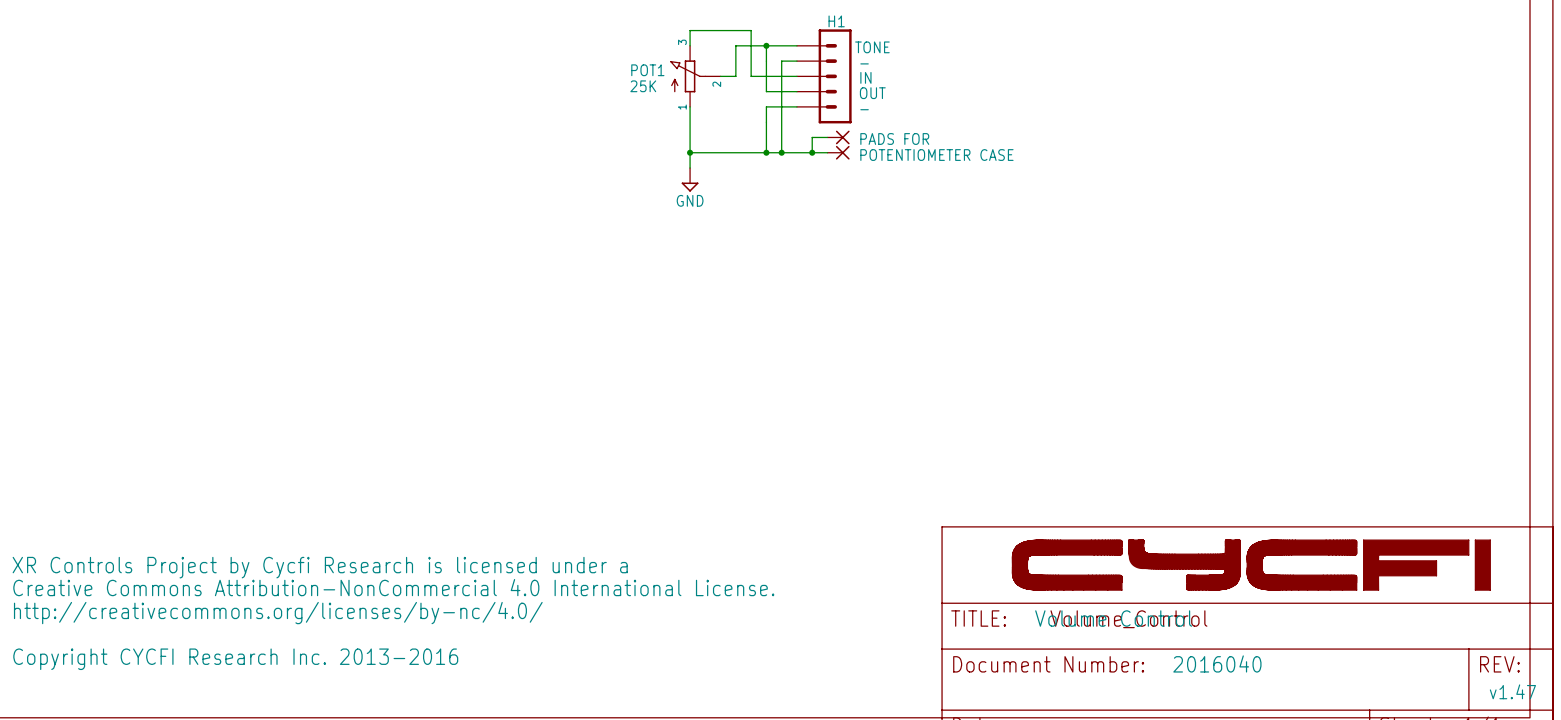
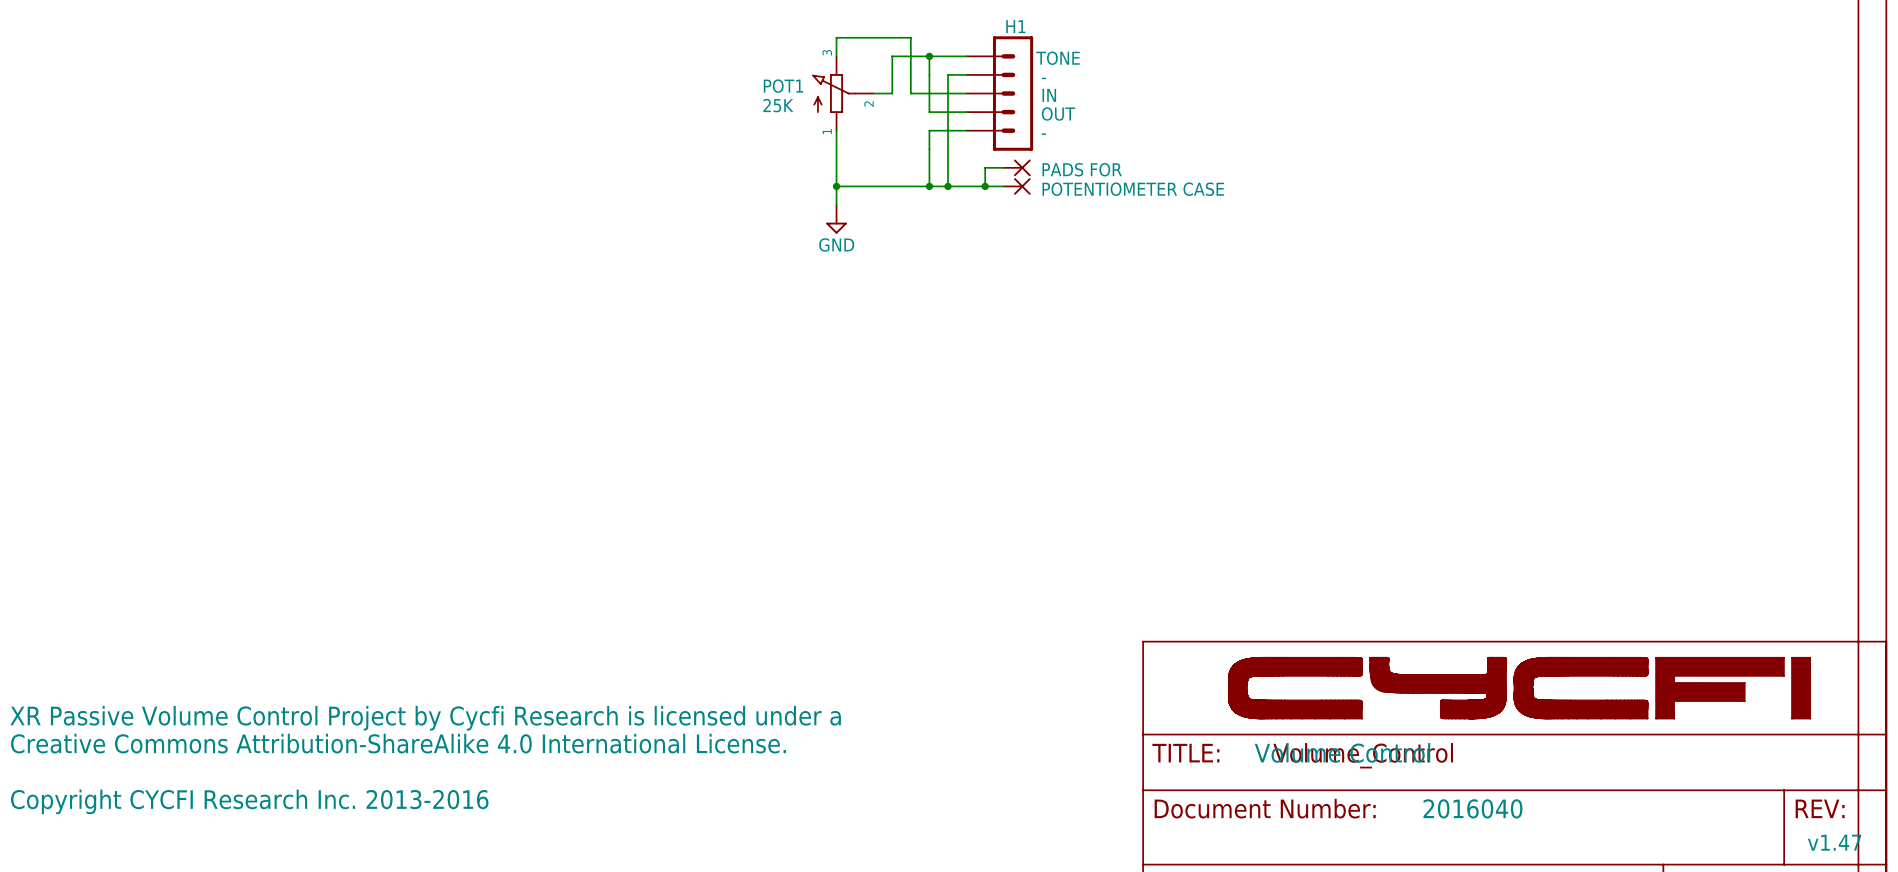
text: XR Controls Project by Cycfi Research is licensed under a (320, 567) -> none
text: Creative Commons Attribution-NonCommercial 4.0 International License. (393, 587) -> XR Passive Volume Control Project by Cycfi Research is licensed under a (425, 718)
text: http://creativecommons.org/licenses/by-nc/4.0/ (278, 613) -> Creative Commons Attribution-ShareAlike 4.0 International License. (398, 743)

